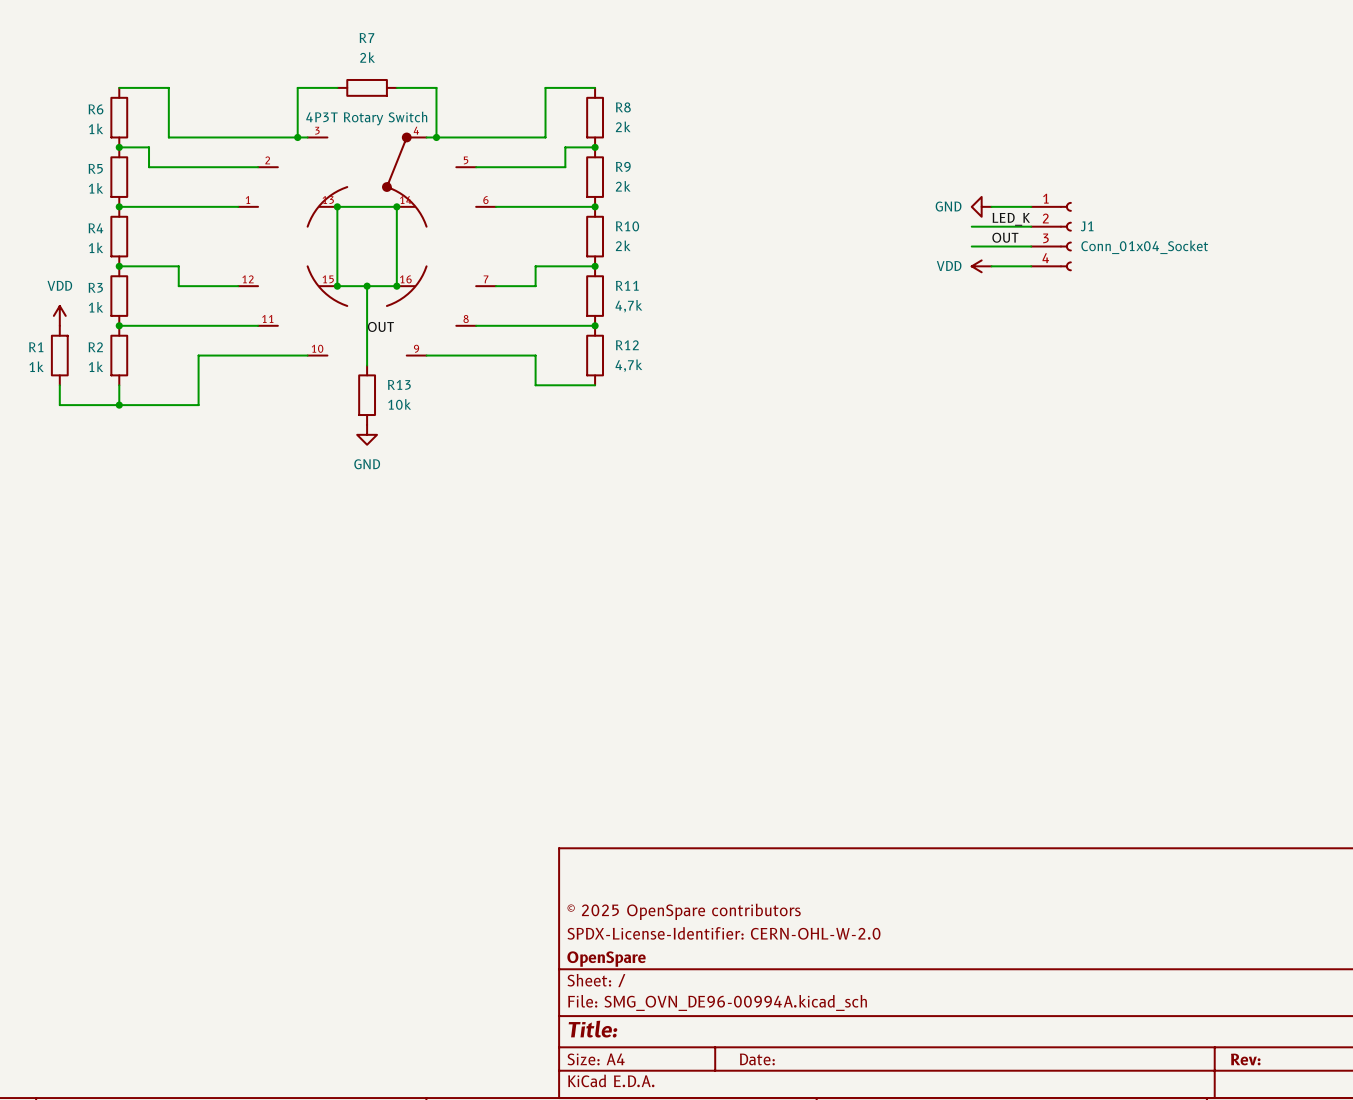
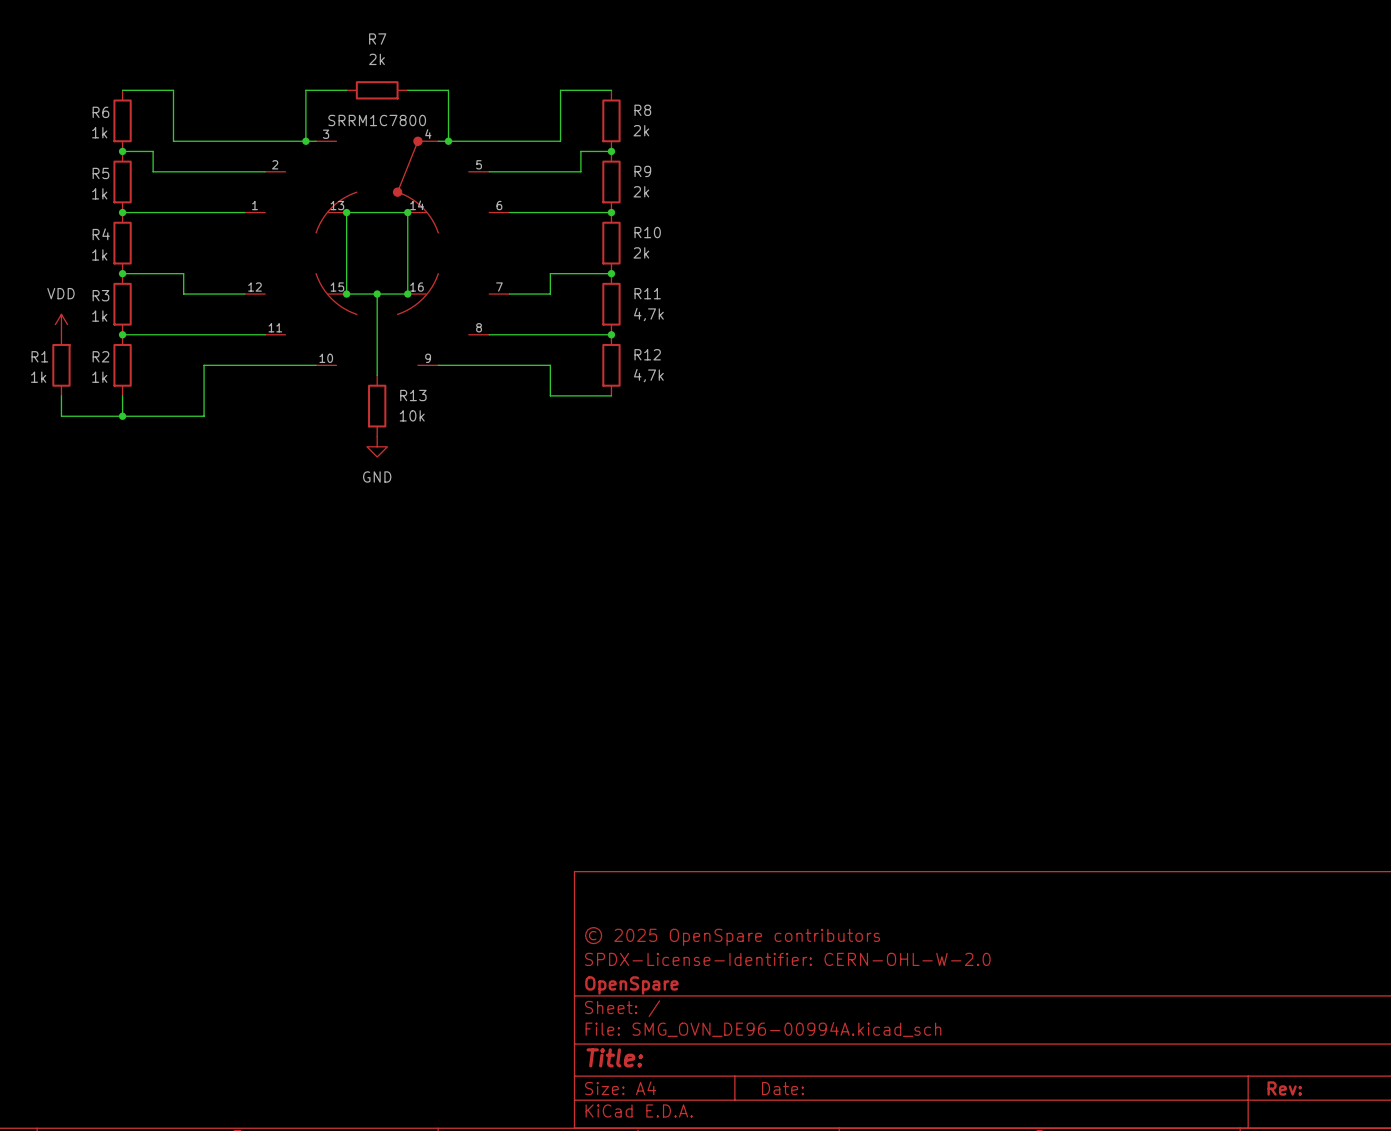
part value: 4P3T Rotary Switch (366, 118) -> SRRM1C7800 (377, 120)
power symbol: GND (981, 206) -> none
wire: (991, 206) (1031, 206) -> none
label: LED_K (1011, 219) -> none
wire: (971, 226) (1031, 226) -> none
J1: Conn_01x04_Socket (1051, 236) -> none
label: OUT (1005, 237) -> none
wire: (971, 246) (1031, 246) -> none
power symbol: VDD (981, 266) -> none
wire: (991, 266) (1031, 266) -> none
label: OUT (380, 326) -> none

